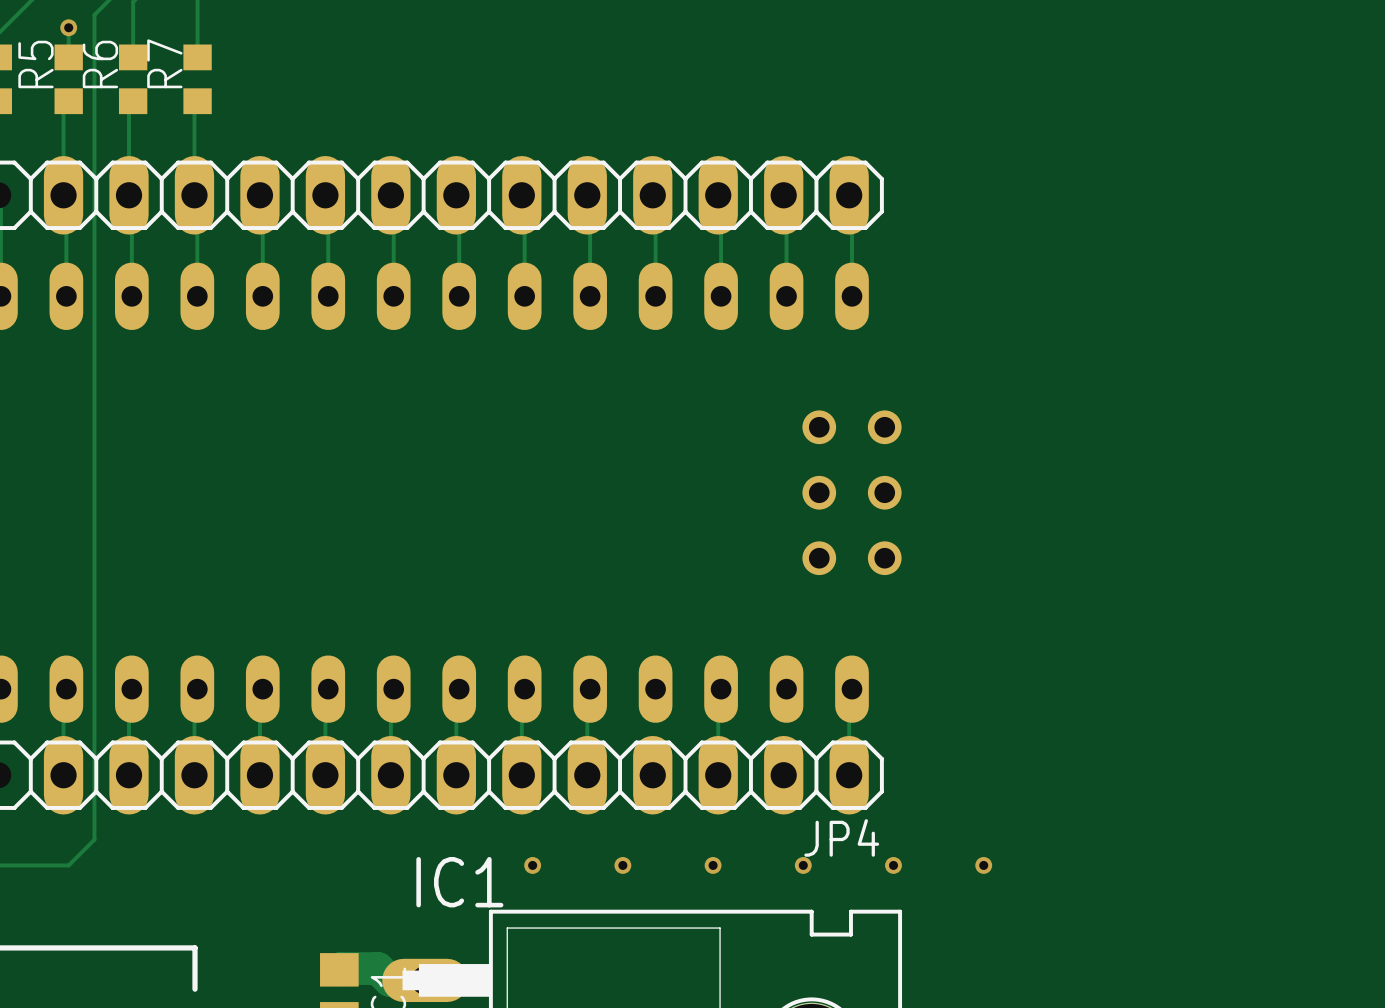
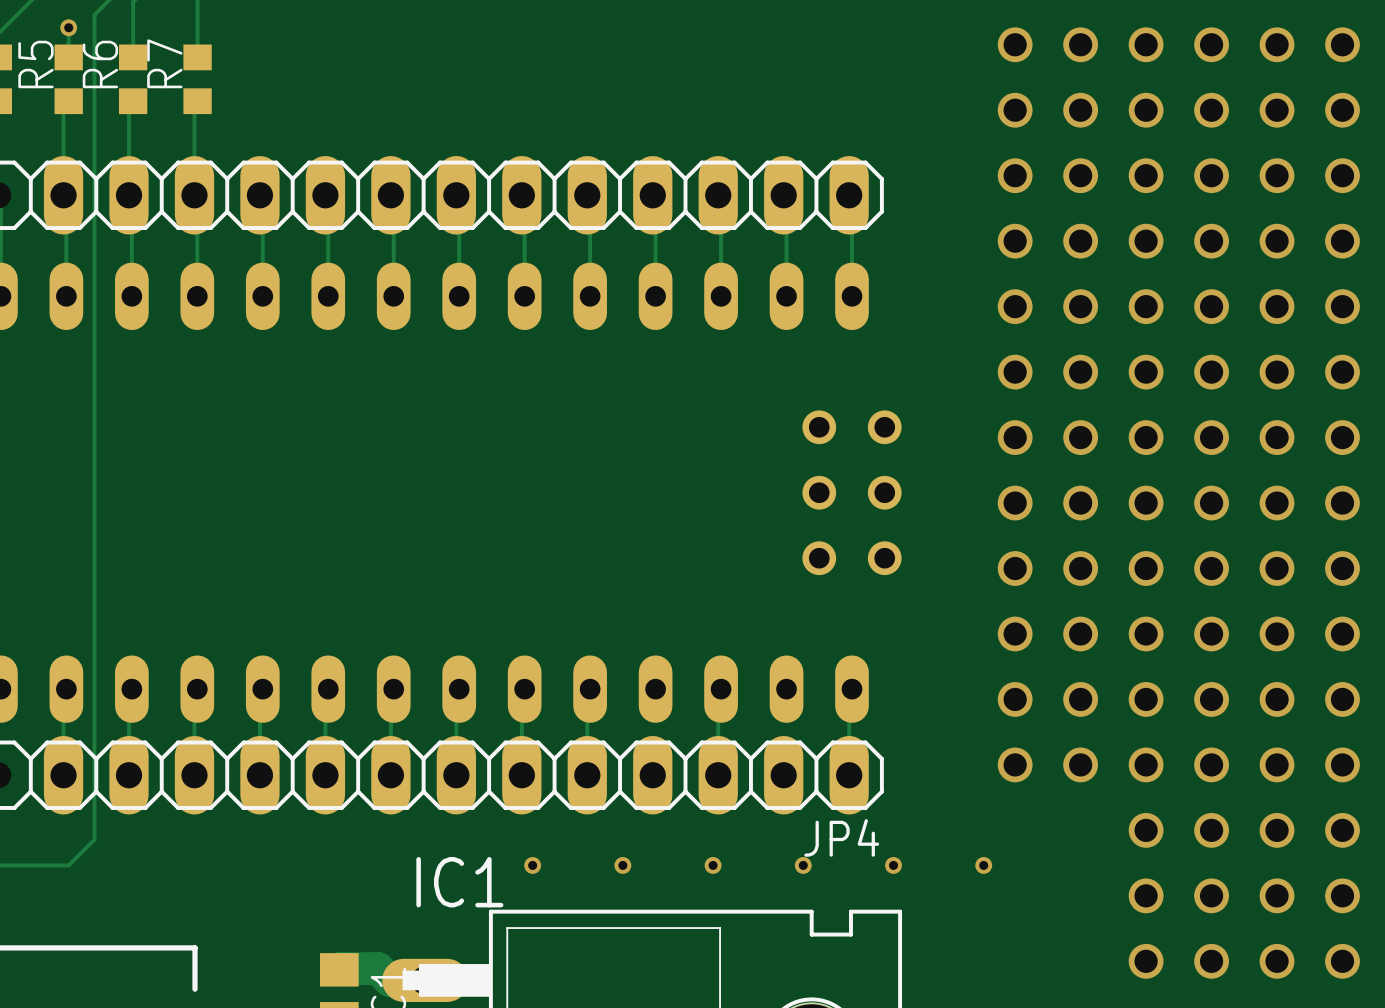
via: none -> (1015, 44)
via: none -> (1080, 44)
via: none -> (1146, 44)
via: none -> (1211, 44)
via: none -> (1277, 44)
via: none -> (1342, 44)
via: none -> (1015, 110)
via: none -> (1080, 110)
via: none -> (1146, 110)
via: none -> (1211, 110)
via: none -> (1277, 110)
via: none -> (1342, 110)
via: none -> (1015, 175)
via: none -> (1080, 175)
via: none -> (1146, 175)
via: none -> (1211, 175)
via: none -> (1277, 175)
via: none -> (1342, 175)
via: none -> (1015, 241)
via: none -> (1080, 241)
via: none -> (1146, 241)
via: none -> (1211, 241)
via: none -> (1277, 241)
via: none -> (1342, 241)
via: none -> (1015, 306)
via: none -> (1080, 306)
via: none -> (1146, 306)
via: none -> (1211, 306)
via: none -> (1277, 306)
via: none -> (1342, 306)
via: none -> (1015, 372)
via: none -> (1080, 372)
via: none -> (1146, 372)
via: none -> (1211, 372)
via: none -> (1277, 372)
via: none -> (1342, 372)
via: none -> (1015, 437)
via: none -> (1080, 437)
via: none -> (1146, 437)
via: none -> (1211, 437)
via: none -> (1277, 437)
via: none -> (1342, 437)
via: none -> (1015, 503)
via: none -> (1080, 503)
via: none -> (1146, 503)
via: none -> (1211, 503)
via: none -> (1277, 503)
via: none -> (1342, 503)
via: none -> (1015, 568)
via: none -> (1080, 568)
via: none -> (1146, 568)
via: none -> (1211, 568)
via: none -> (1277, 568)
via: none -> (1342, 568)
via: none -> (1015, 633)
via: none -> (1080, 633)
via: none -> (1146, 633)
via: none -> (1211, 633)
via: none -> (1277, 633)
via: none -> (1342, 633)
via: none -> (1015, 699)
via: none -> (1080, 699)
via: none -> (1146, 699)
via: none -> (1211, 699)
via: none -> (1277, 699)
via: none -> (1342, 699)
via: none -> (1015, 764)
via: none -> (1080, 764)
via: none -> (1146, 764)
via: none -> (1211, 764)
via: none -> (1277, 764)
via: none -> (1342, 764)
via: none -> (1146, 830)
via: none -> (1211, 830)
via: none -> (1277, 830)
via: none -> (1342, 830)
via: none -> (1146, 895)
via: none -> (1211, 895)
via: none -> (1277, 895)
via: none -> (1342, 895)
via: none -> (1146, 961)
via: none -> (1211, 961)
via: none -> (1277, 961)
via: none -> (1342, 961)

